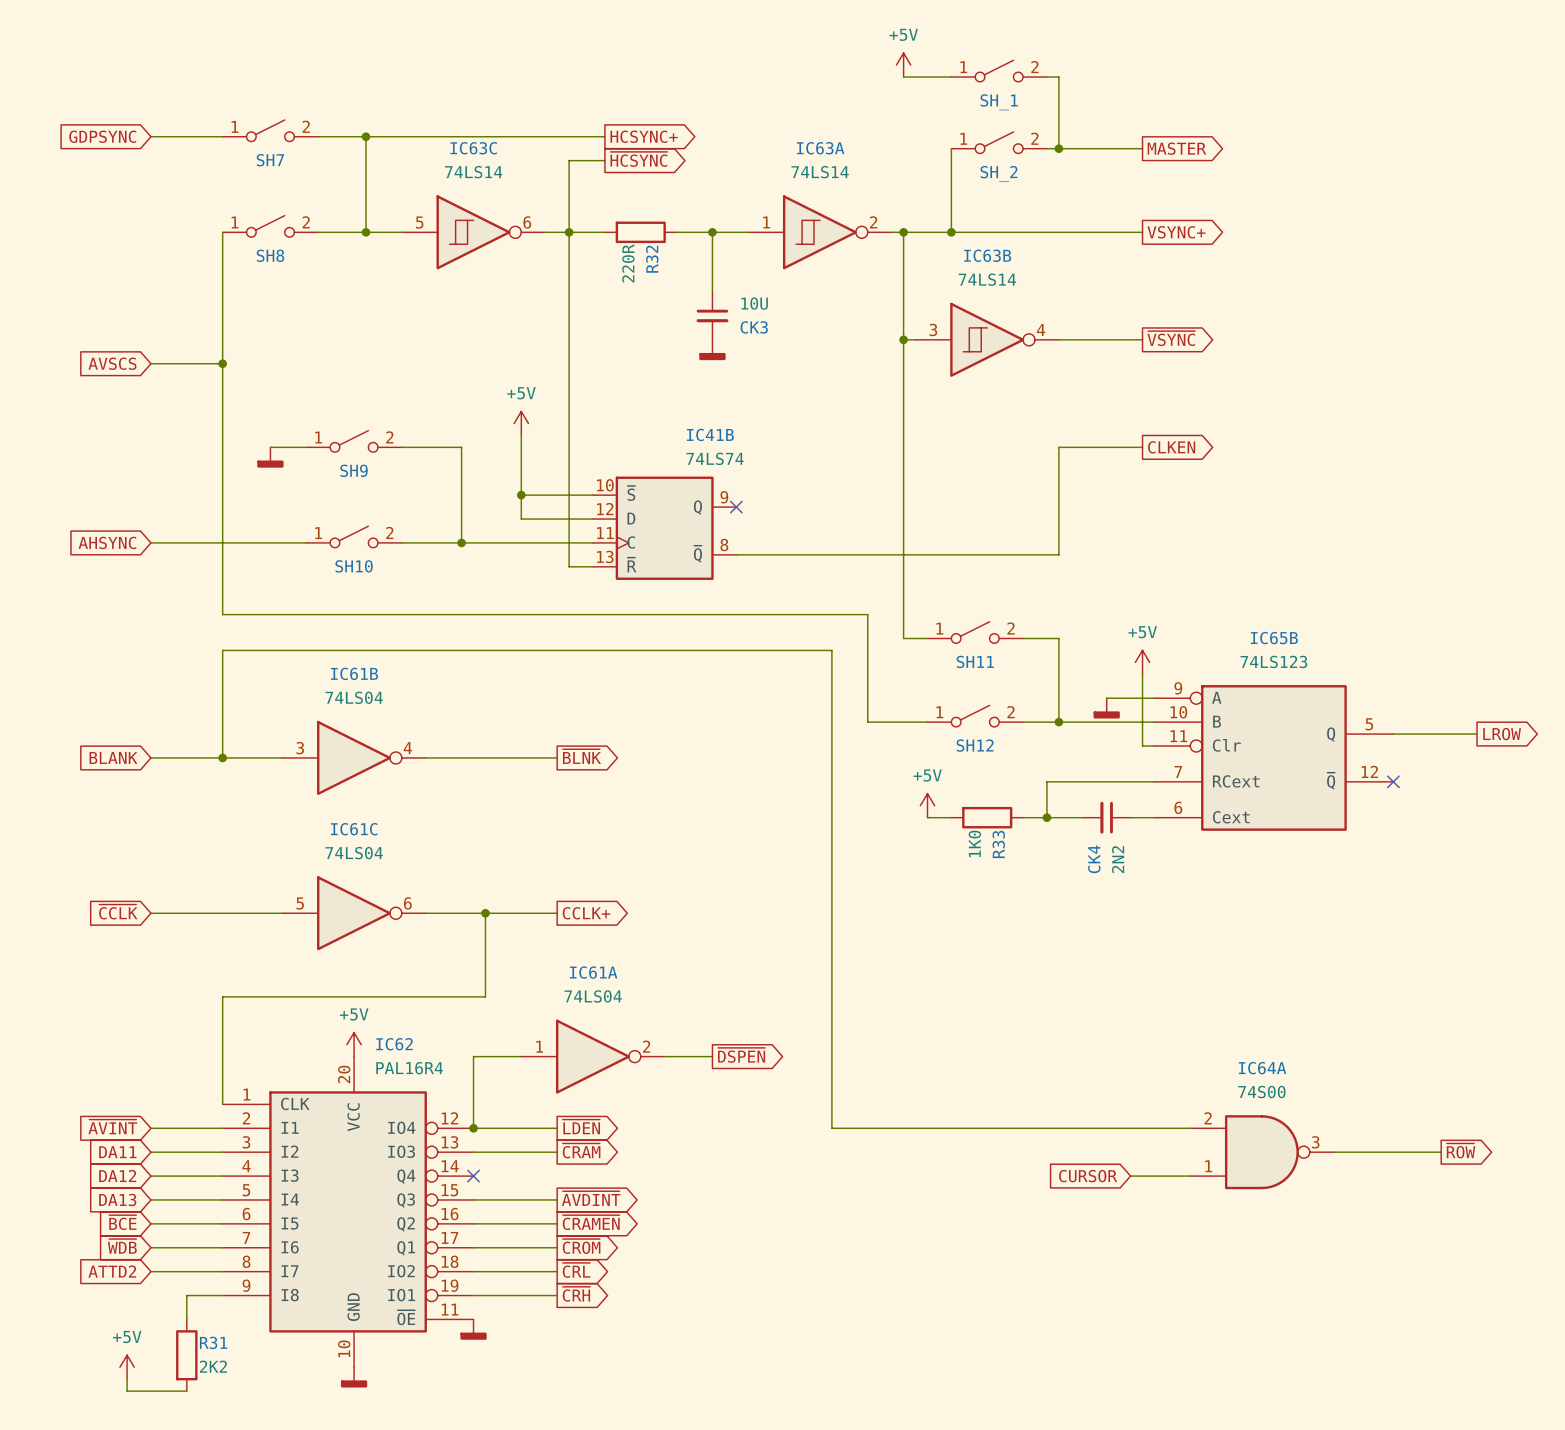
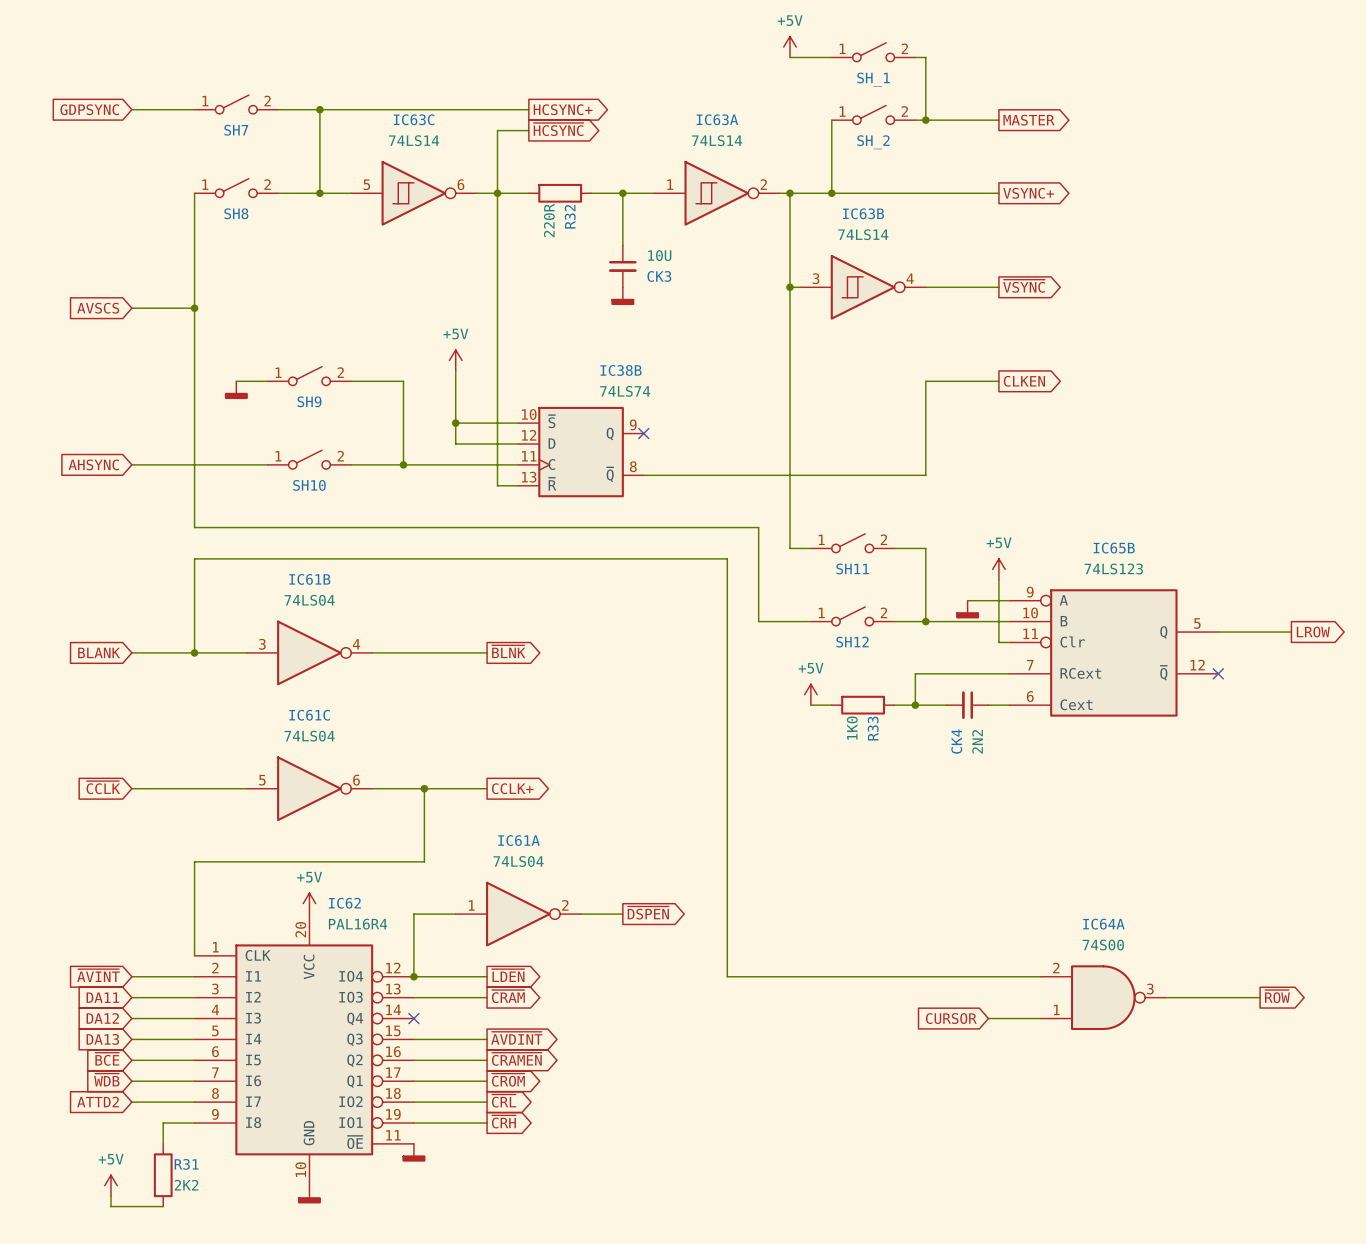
IC41B name: IC41B (710, 434) -> IC38B (621, 370)

